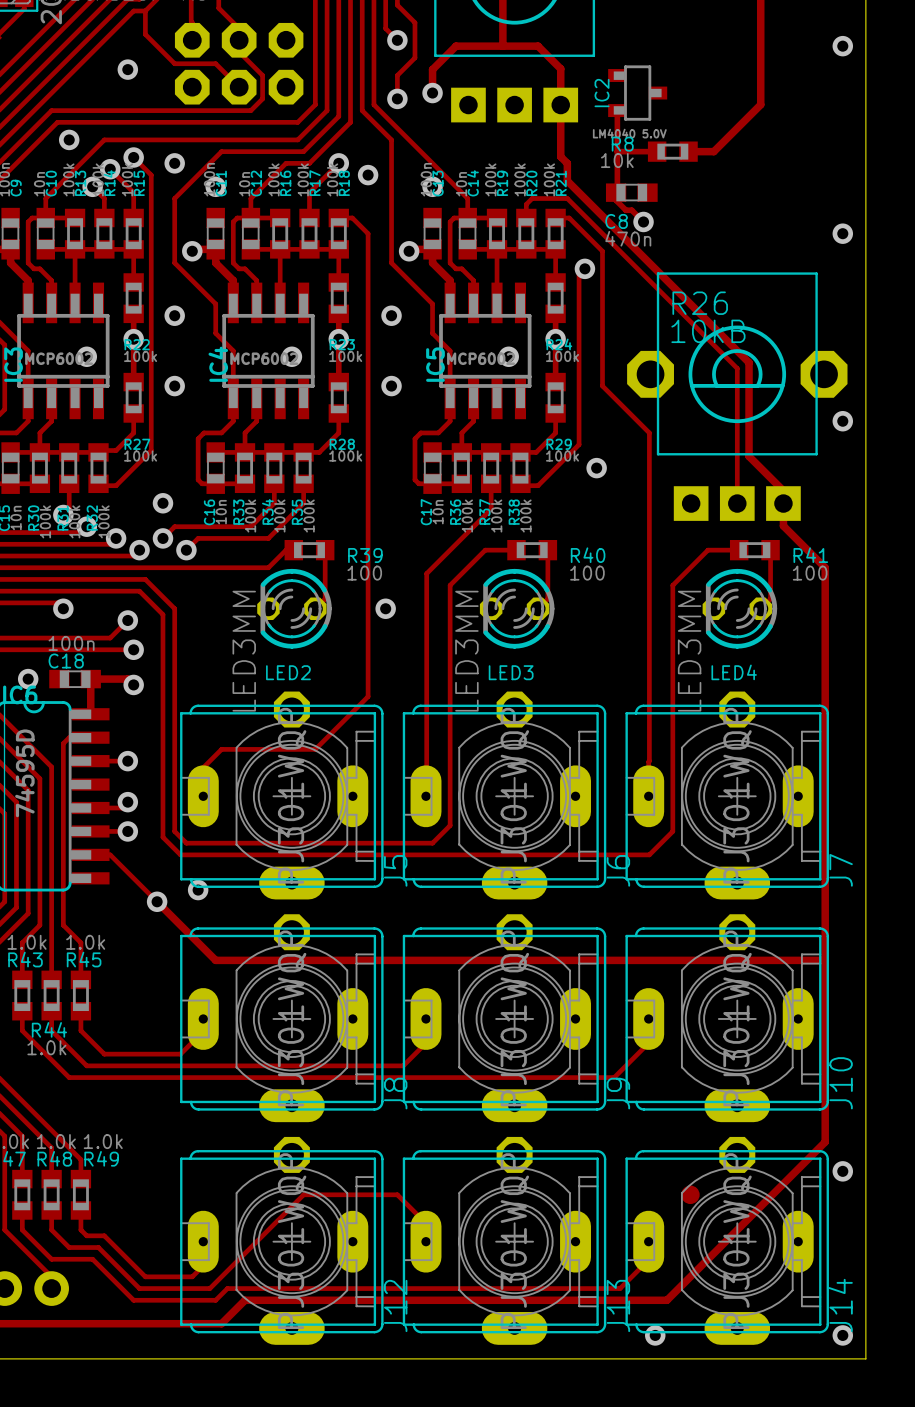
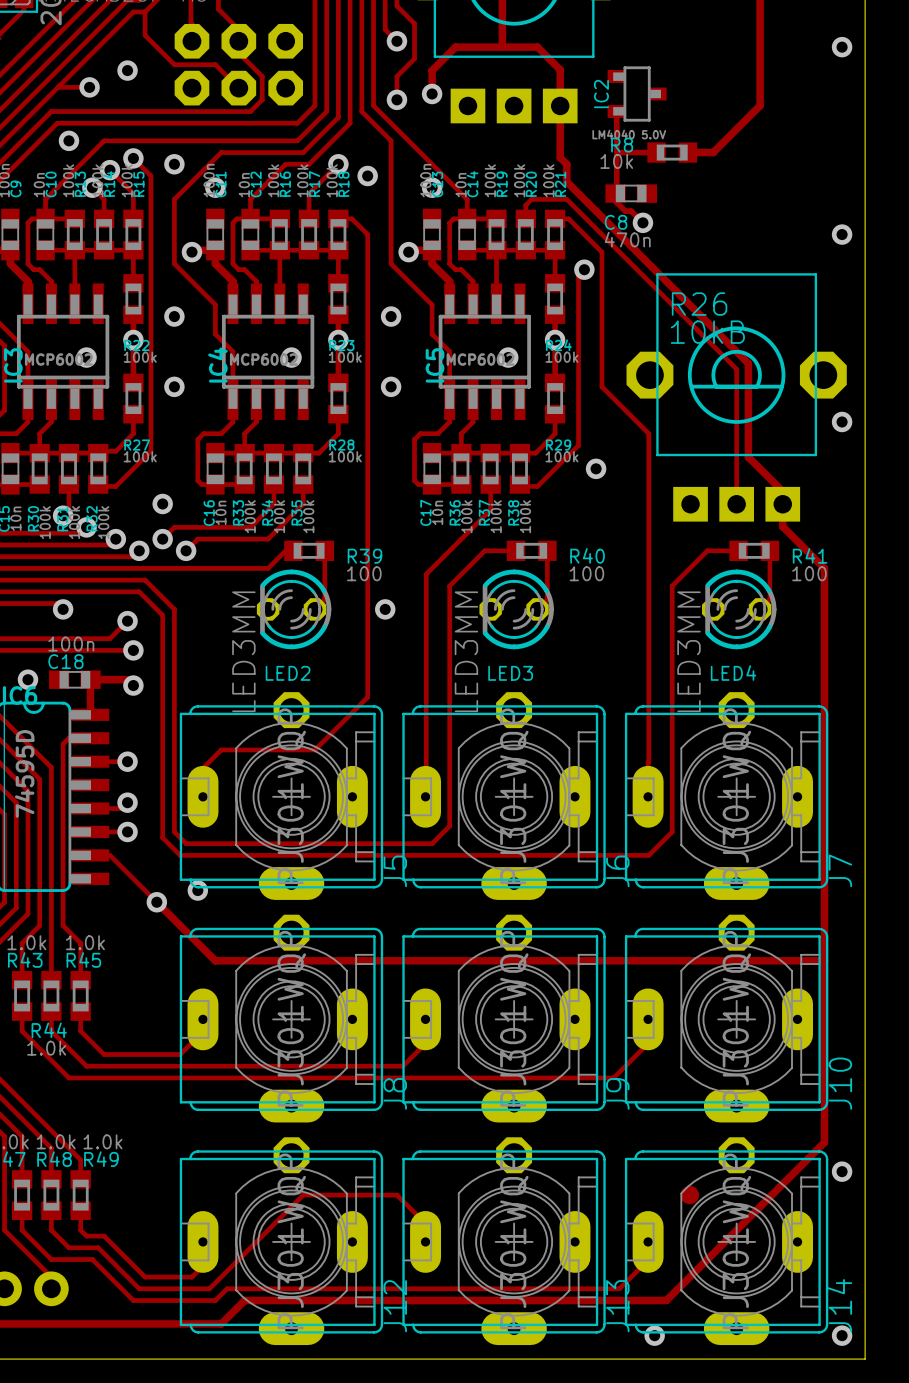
track: none -> (59, 85) (58, 87) (89, 87)
via: none -> (89, 87)

